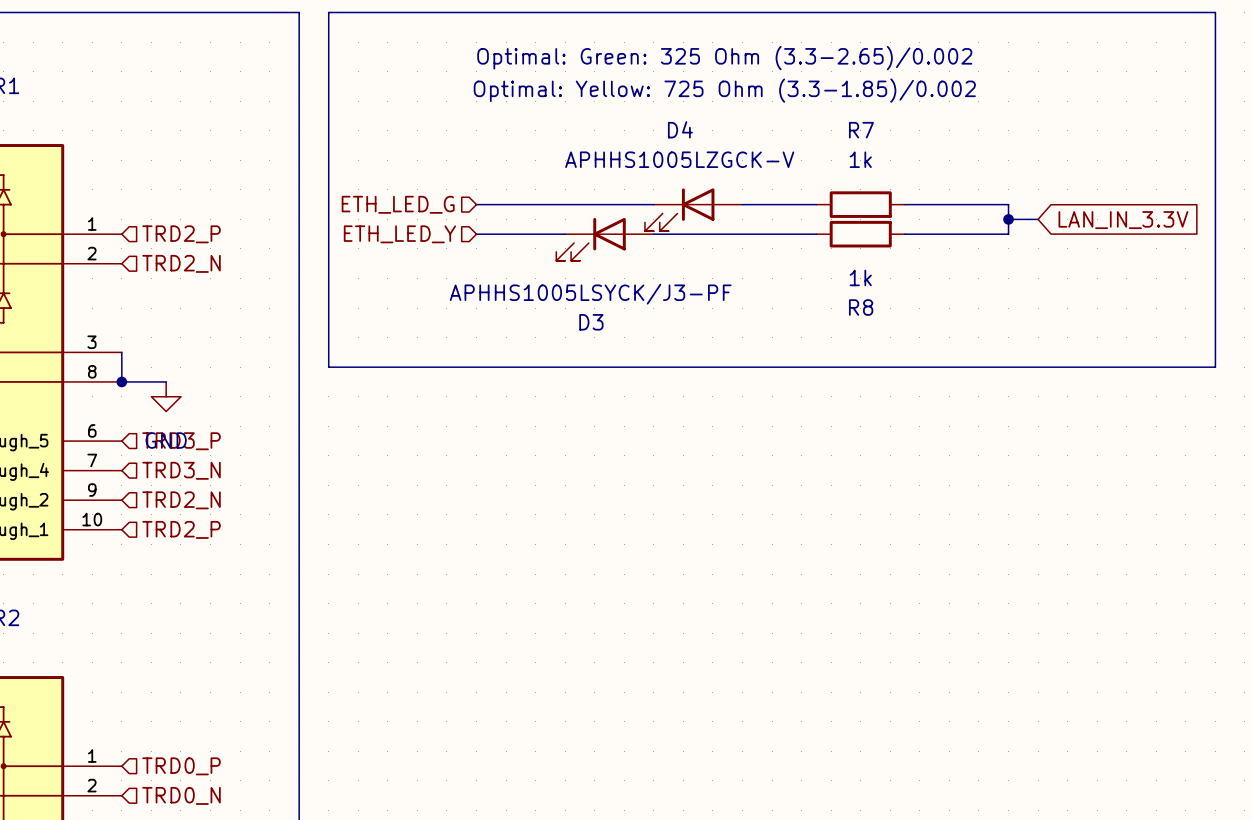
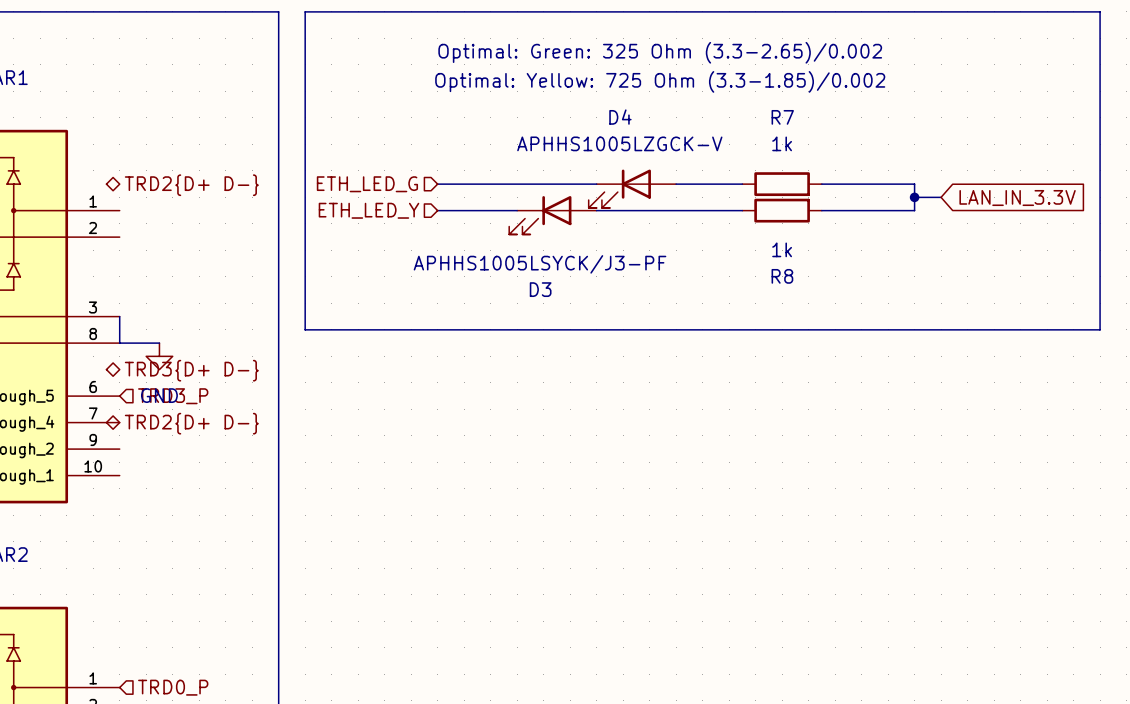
hierarchical label: none -> TRD2{D+ D-} (191, 185)
hierarchical label: TRD2_P (181, 234) -> none
hierarchical label: TRD2_N (181, 263) -> none
junction: (121, 381) -> none
hierarchical label: none -> TRD3{D+ D-} (191, 370)
hierarchical label: TRD3_N (181, 470) -> none
hierarchical label: none -> TRD2{D+ D-} (191, 423)
hierarchical label: TRD2_N (181, 500) -> none
hierarchical label: TRD2_P (181, 529) -> none

